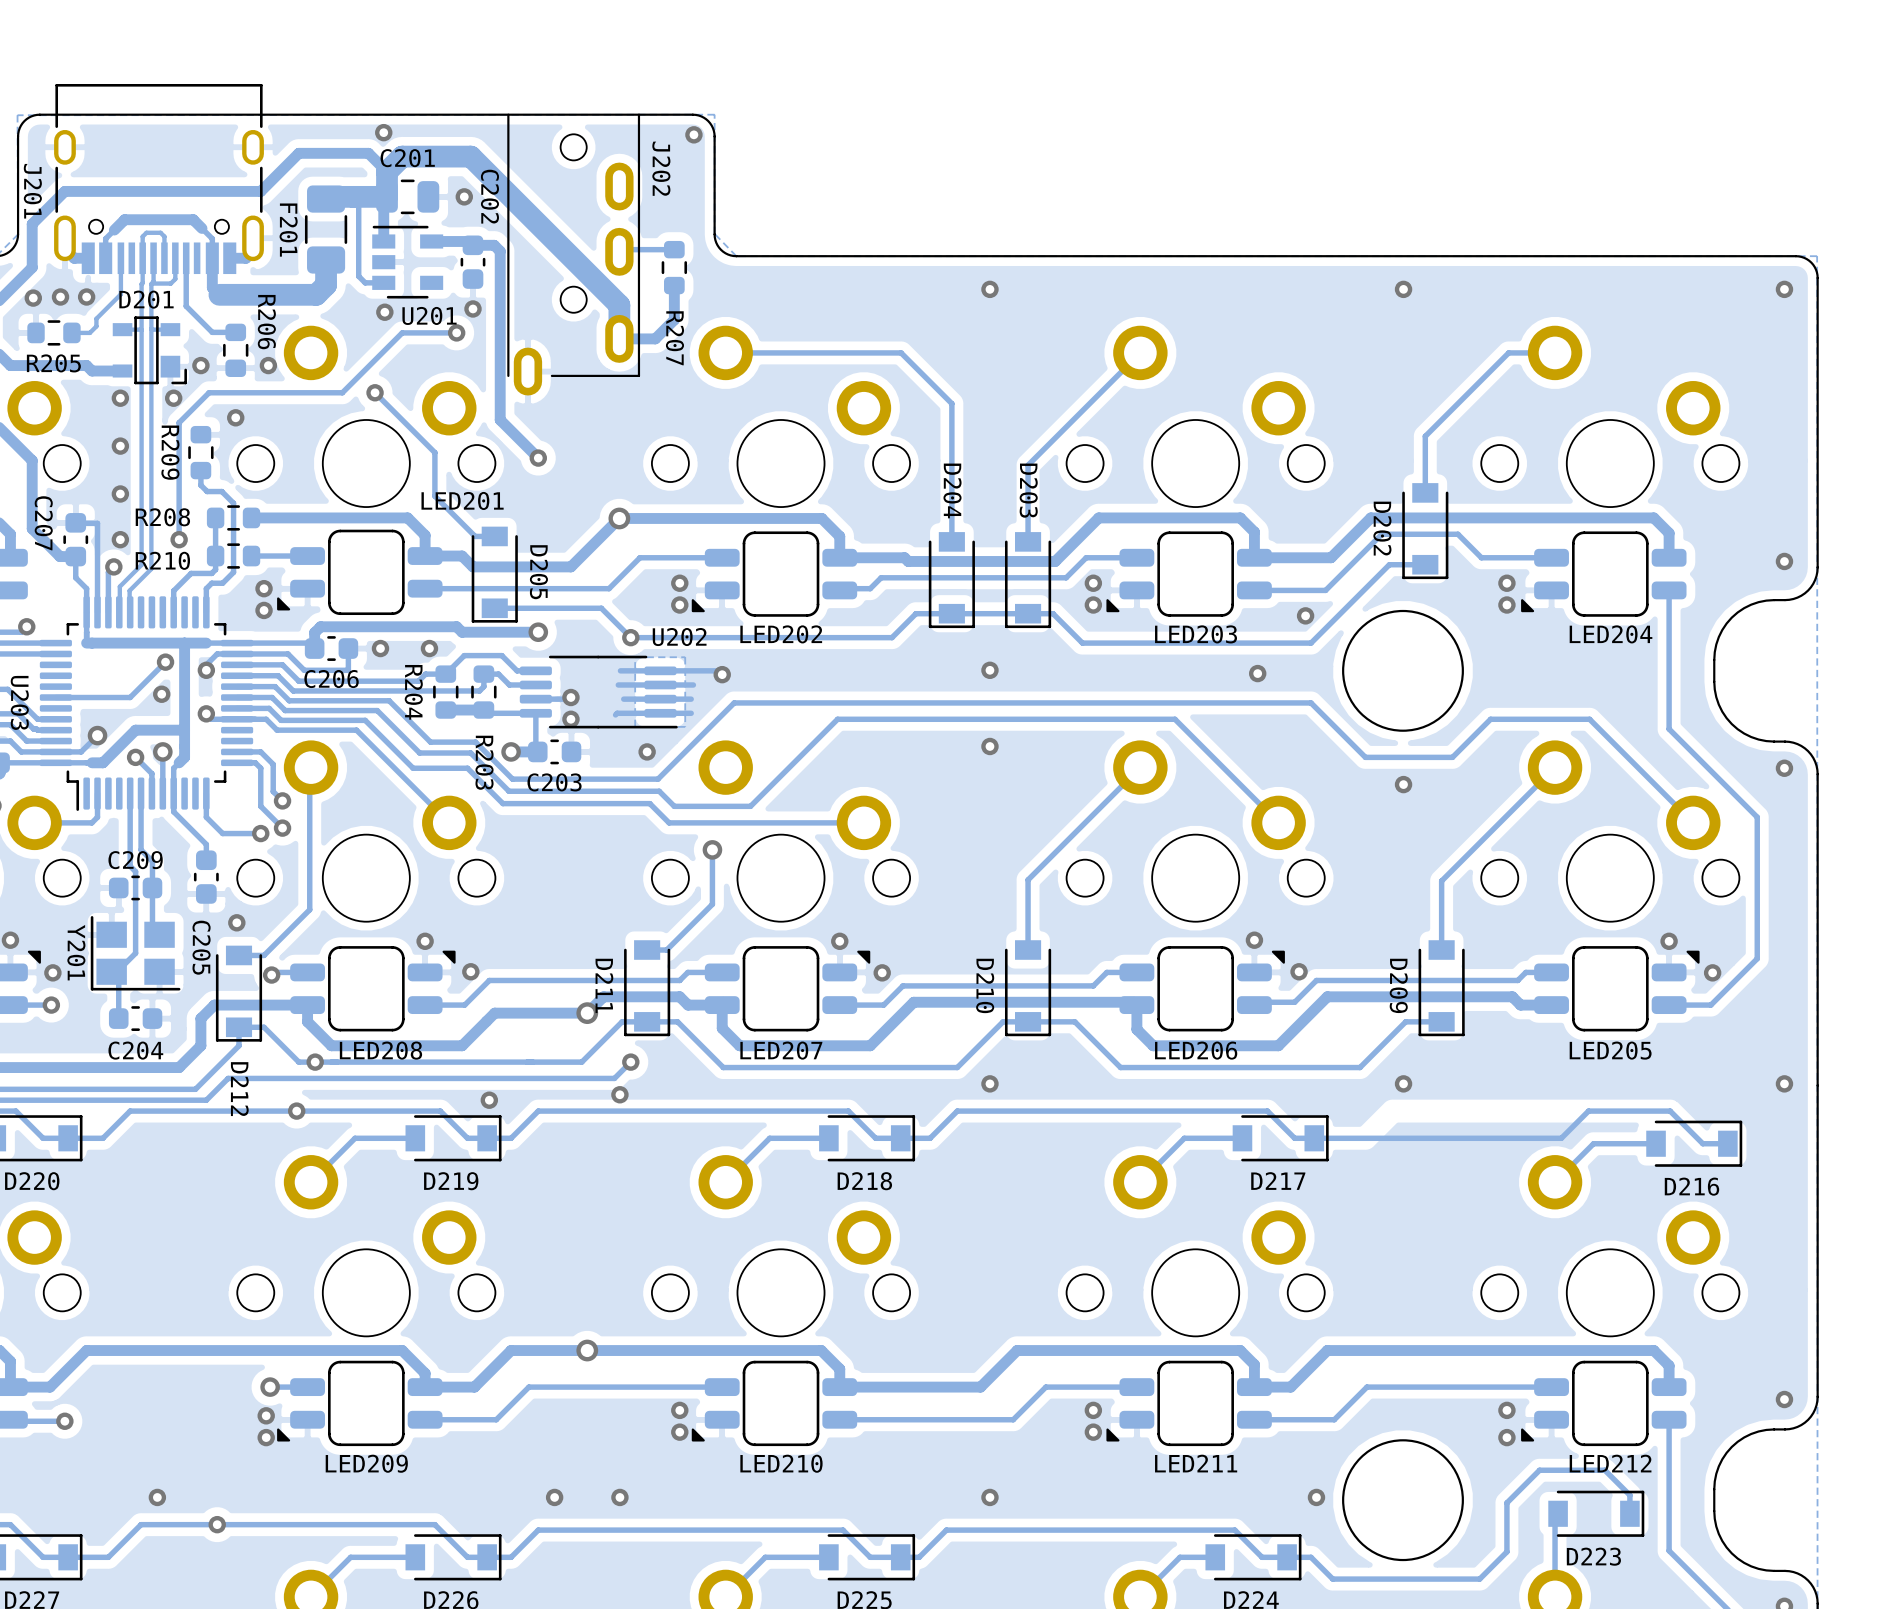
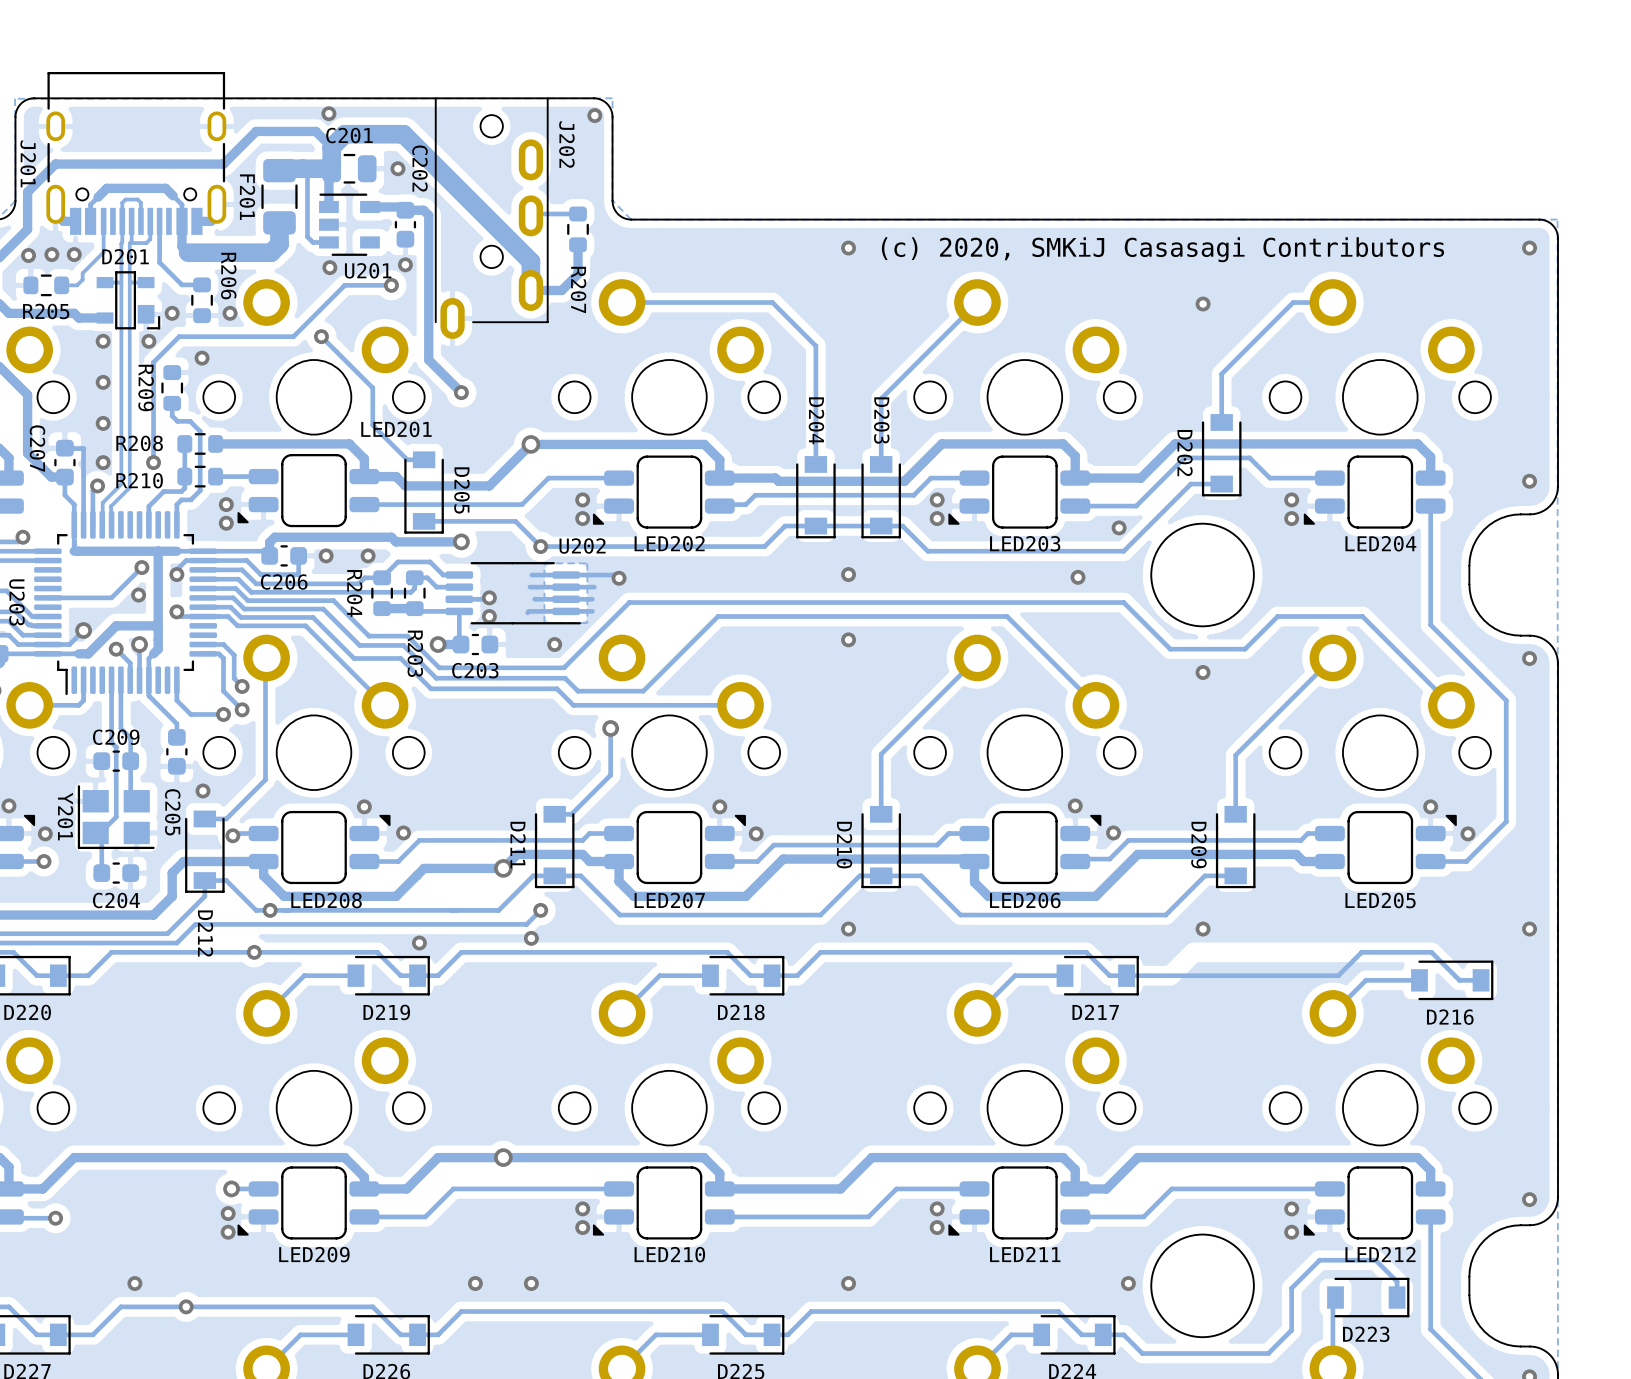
via position: (1403, 289) -> (1203, 304)
text: none -> (c) 2020, SMKiJ Casasagi Contributors (1162, 249)

